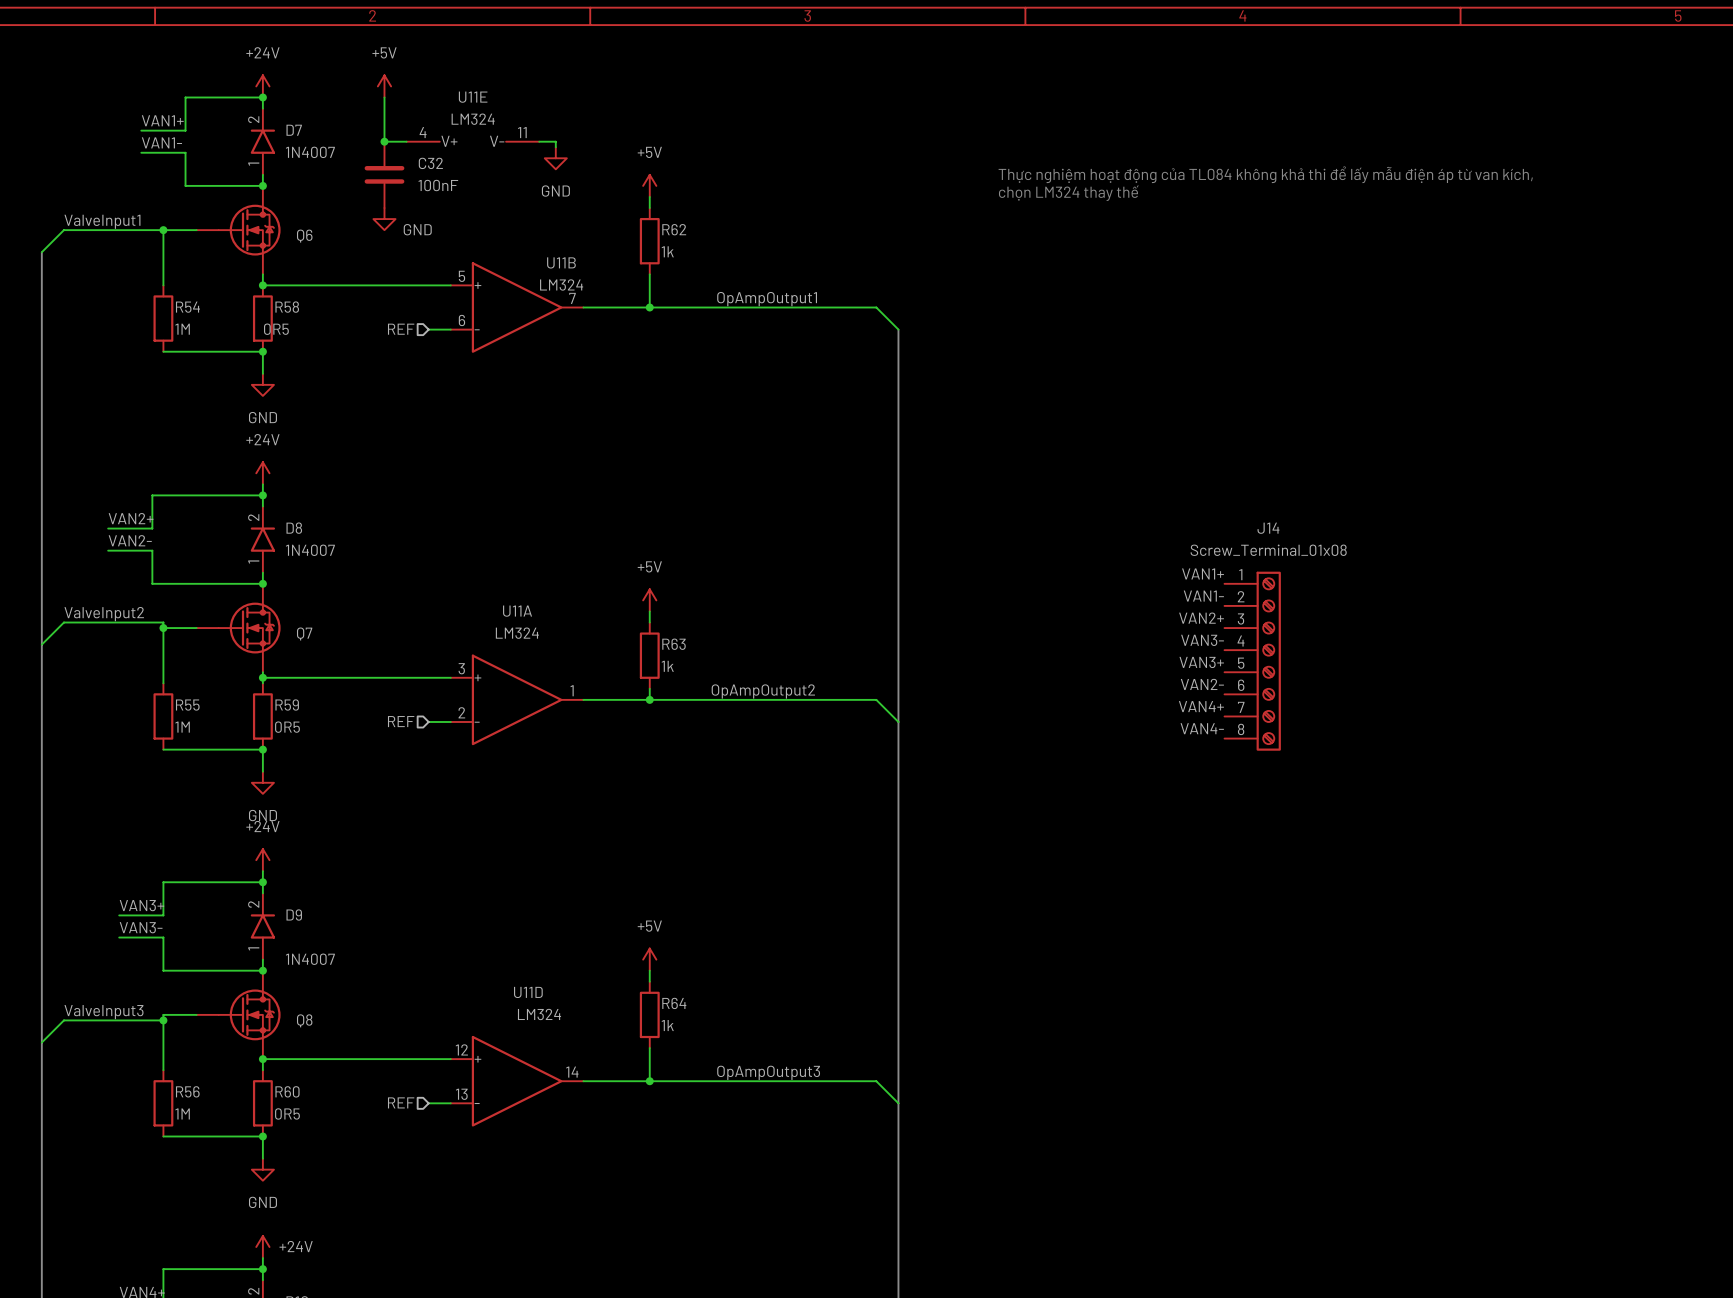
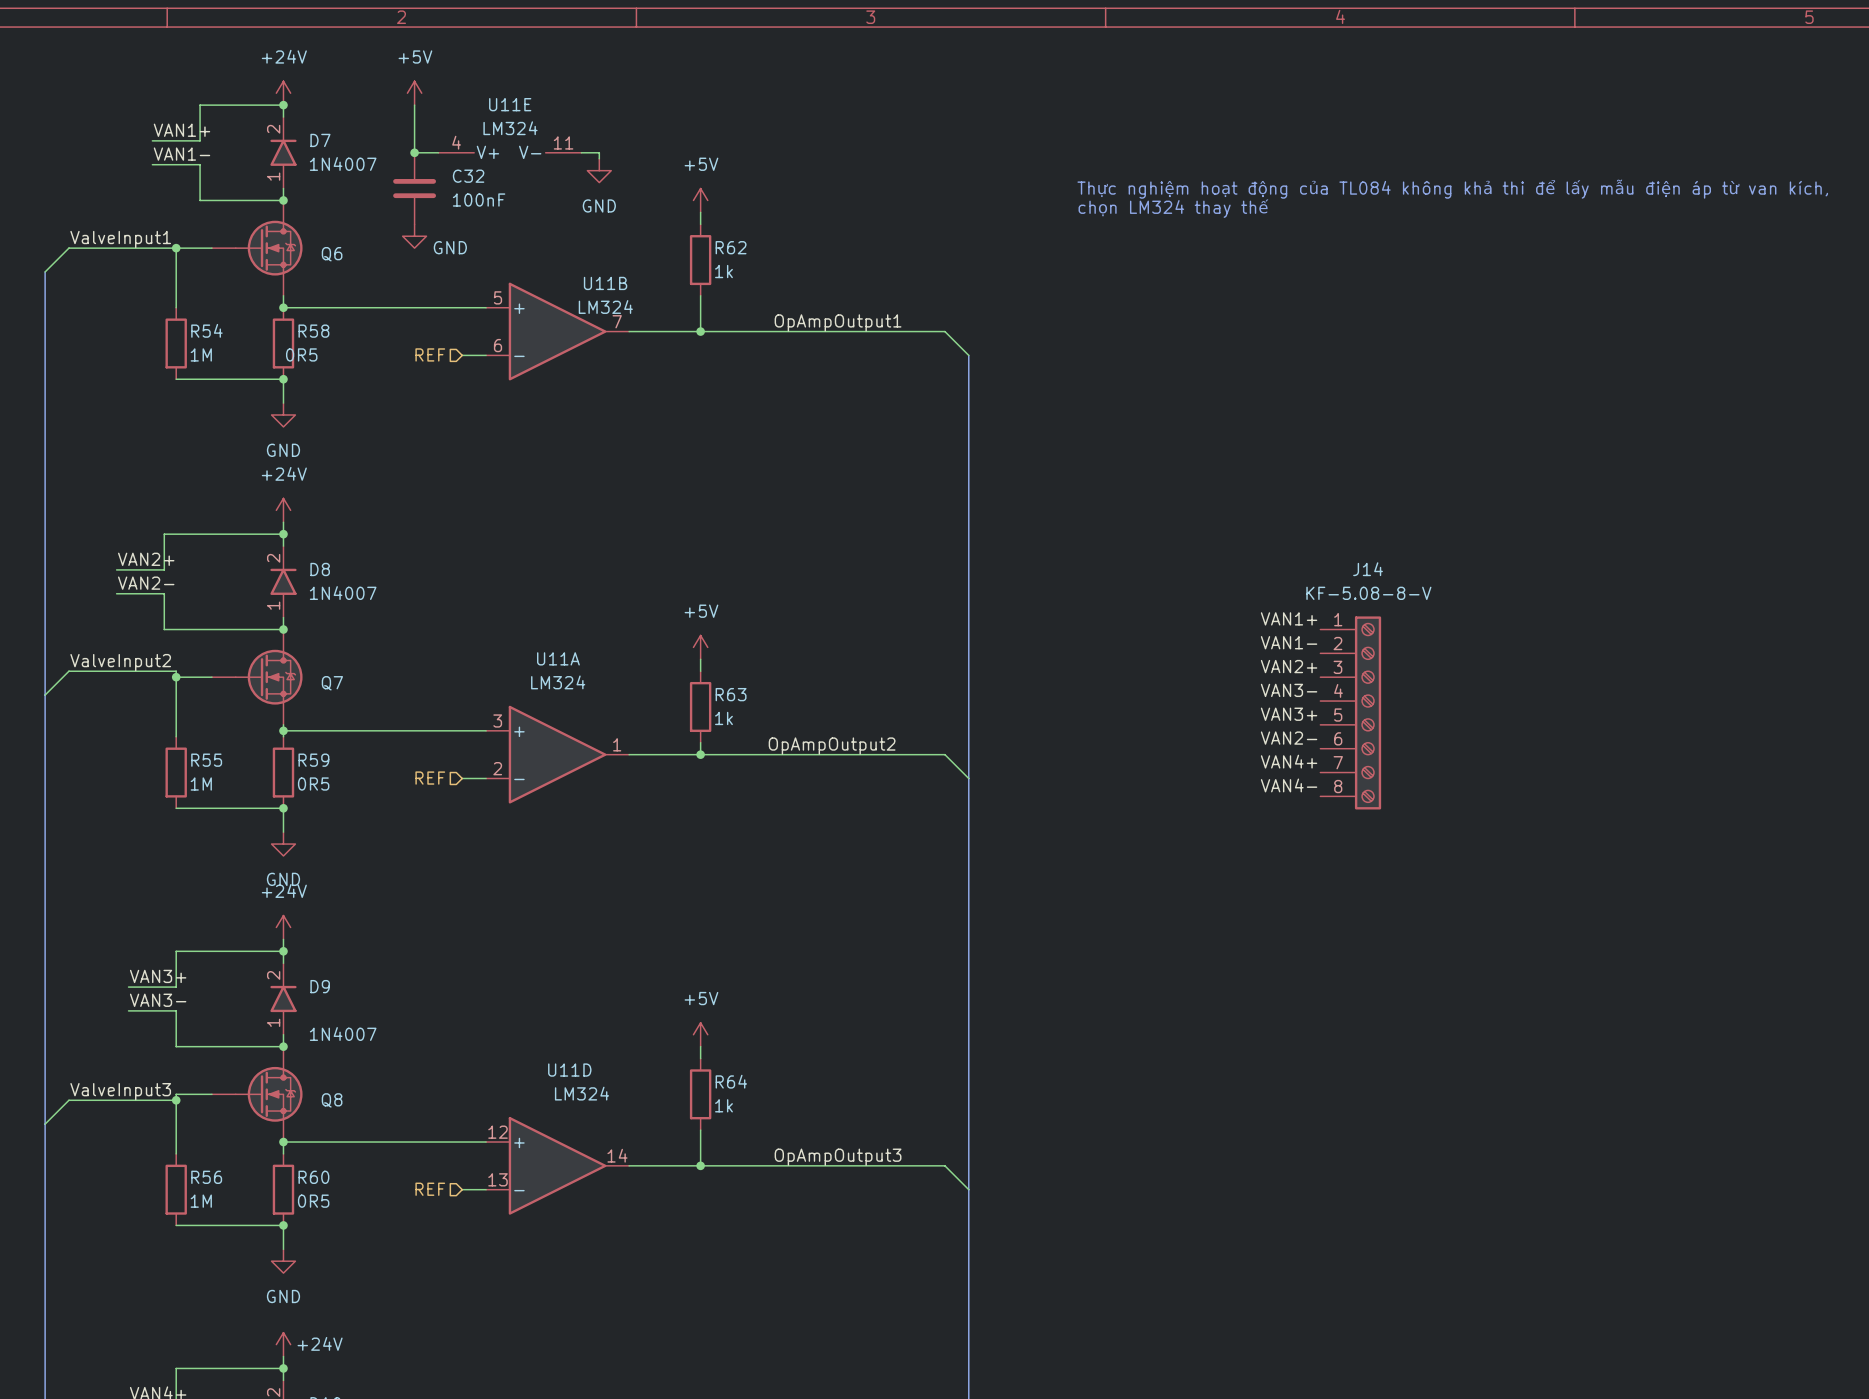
J14 value: Screw_Terminal_01x08 (1268, 550) -> KF-5.08-8-V (1368, 593)

